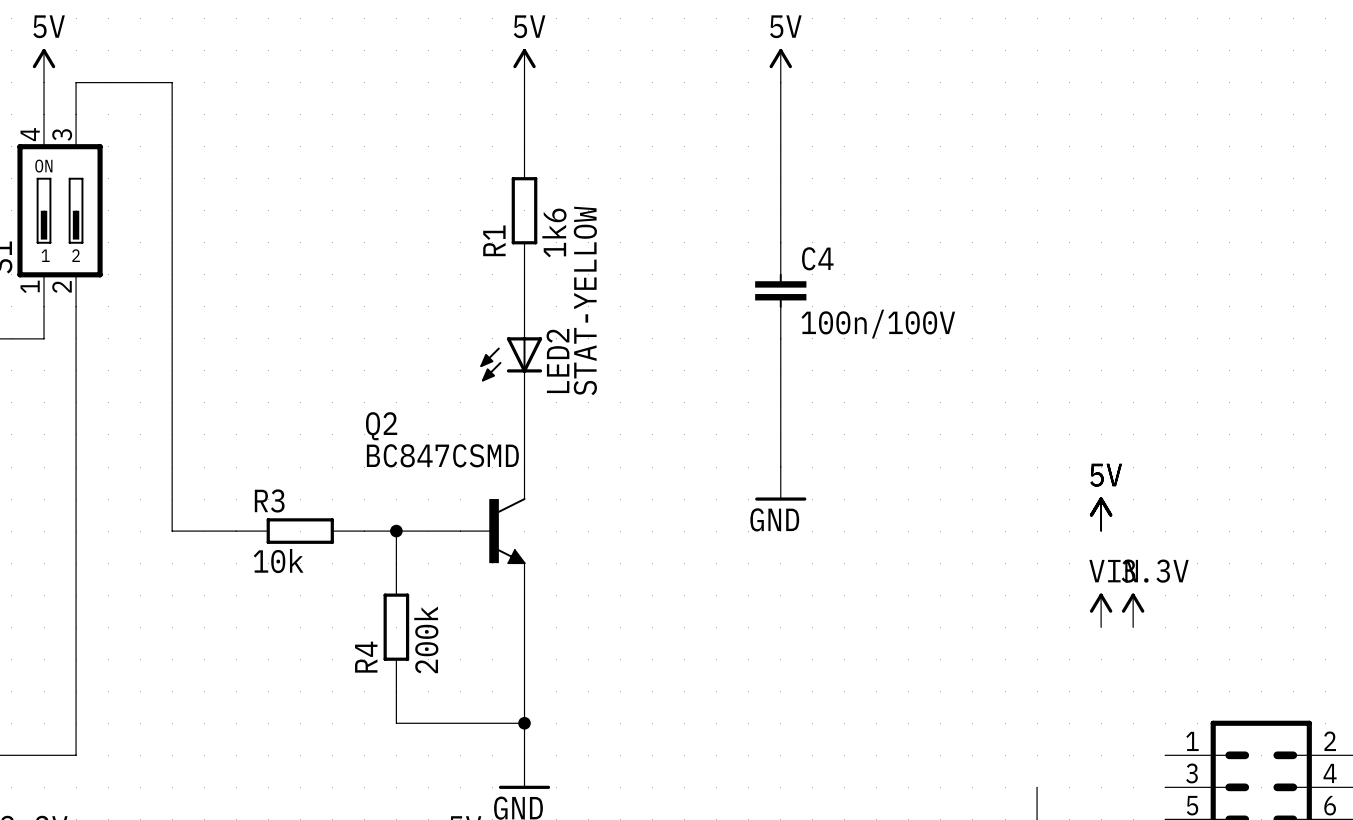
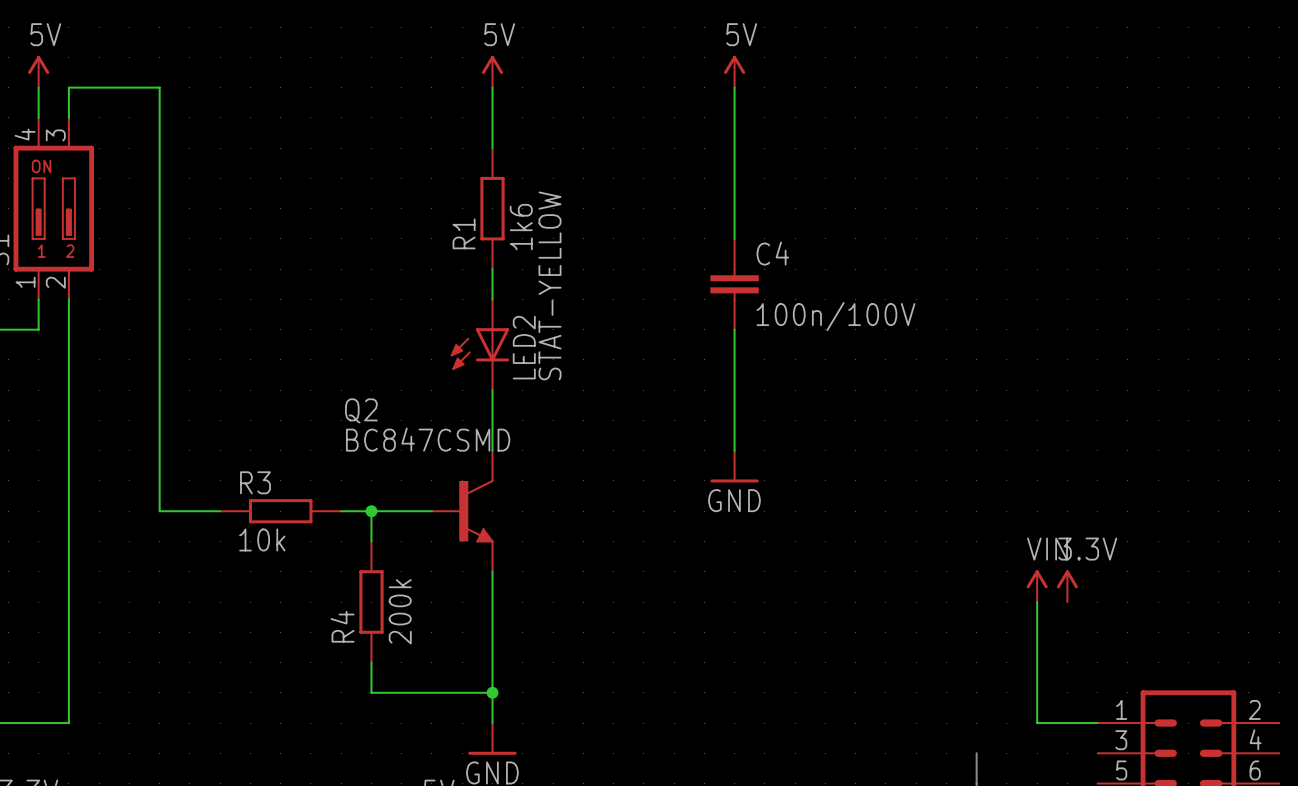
power symbol: 5V (1101, 514) -> none
wire: none -> (1037, 602) (1037, 723) (1097, 723)

